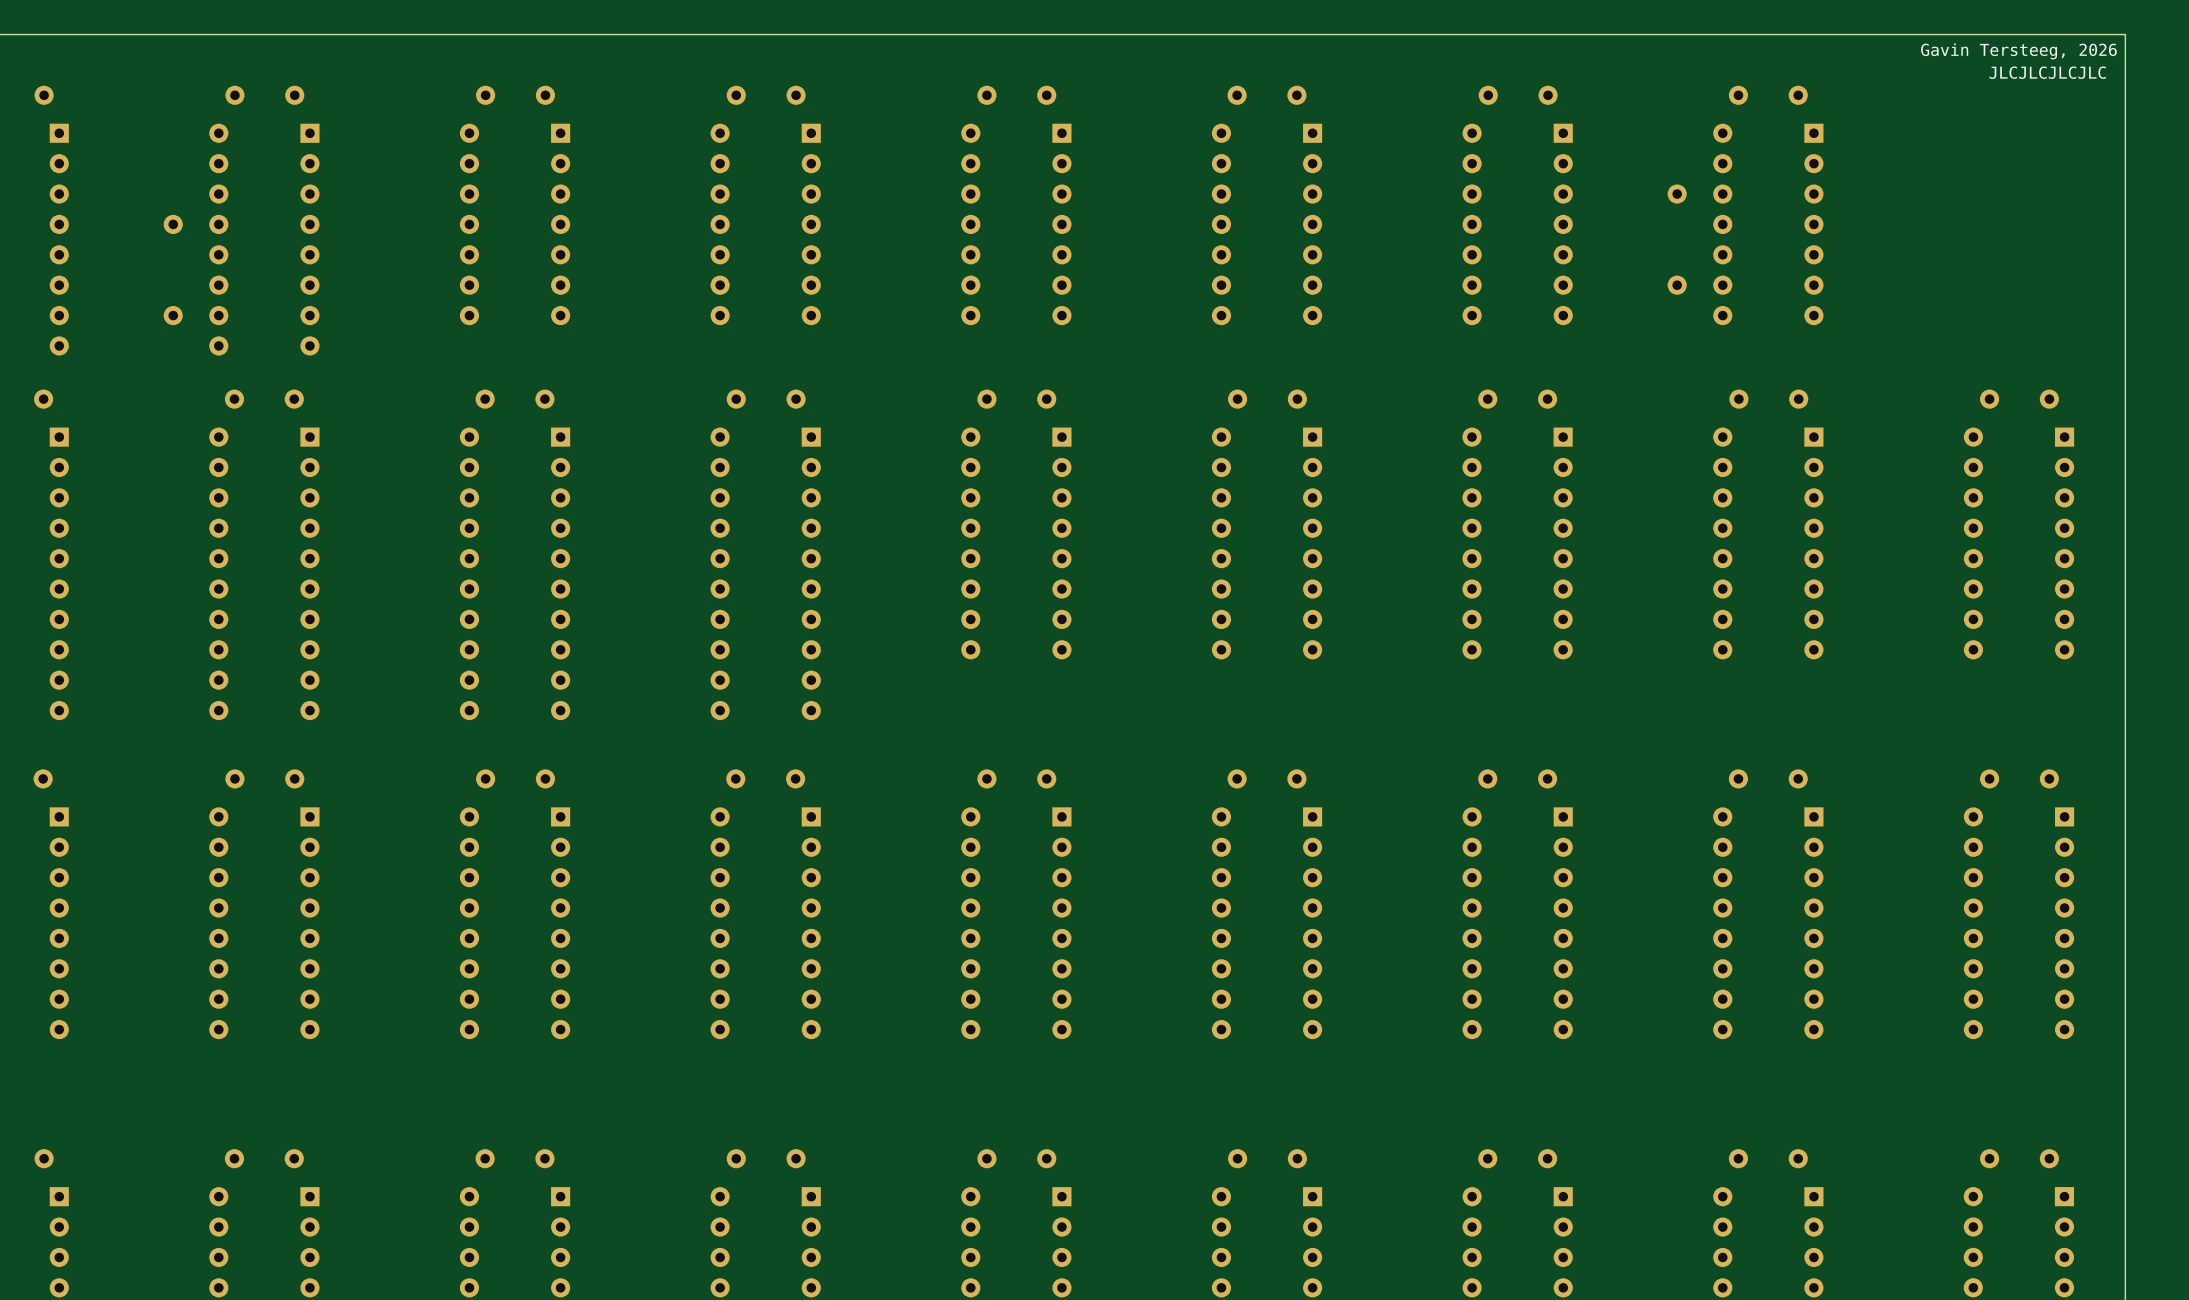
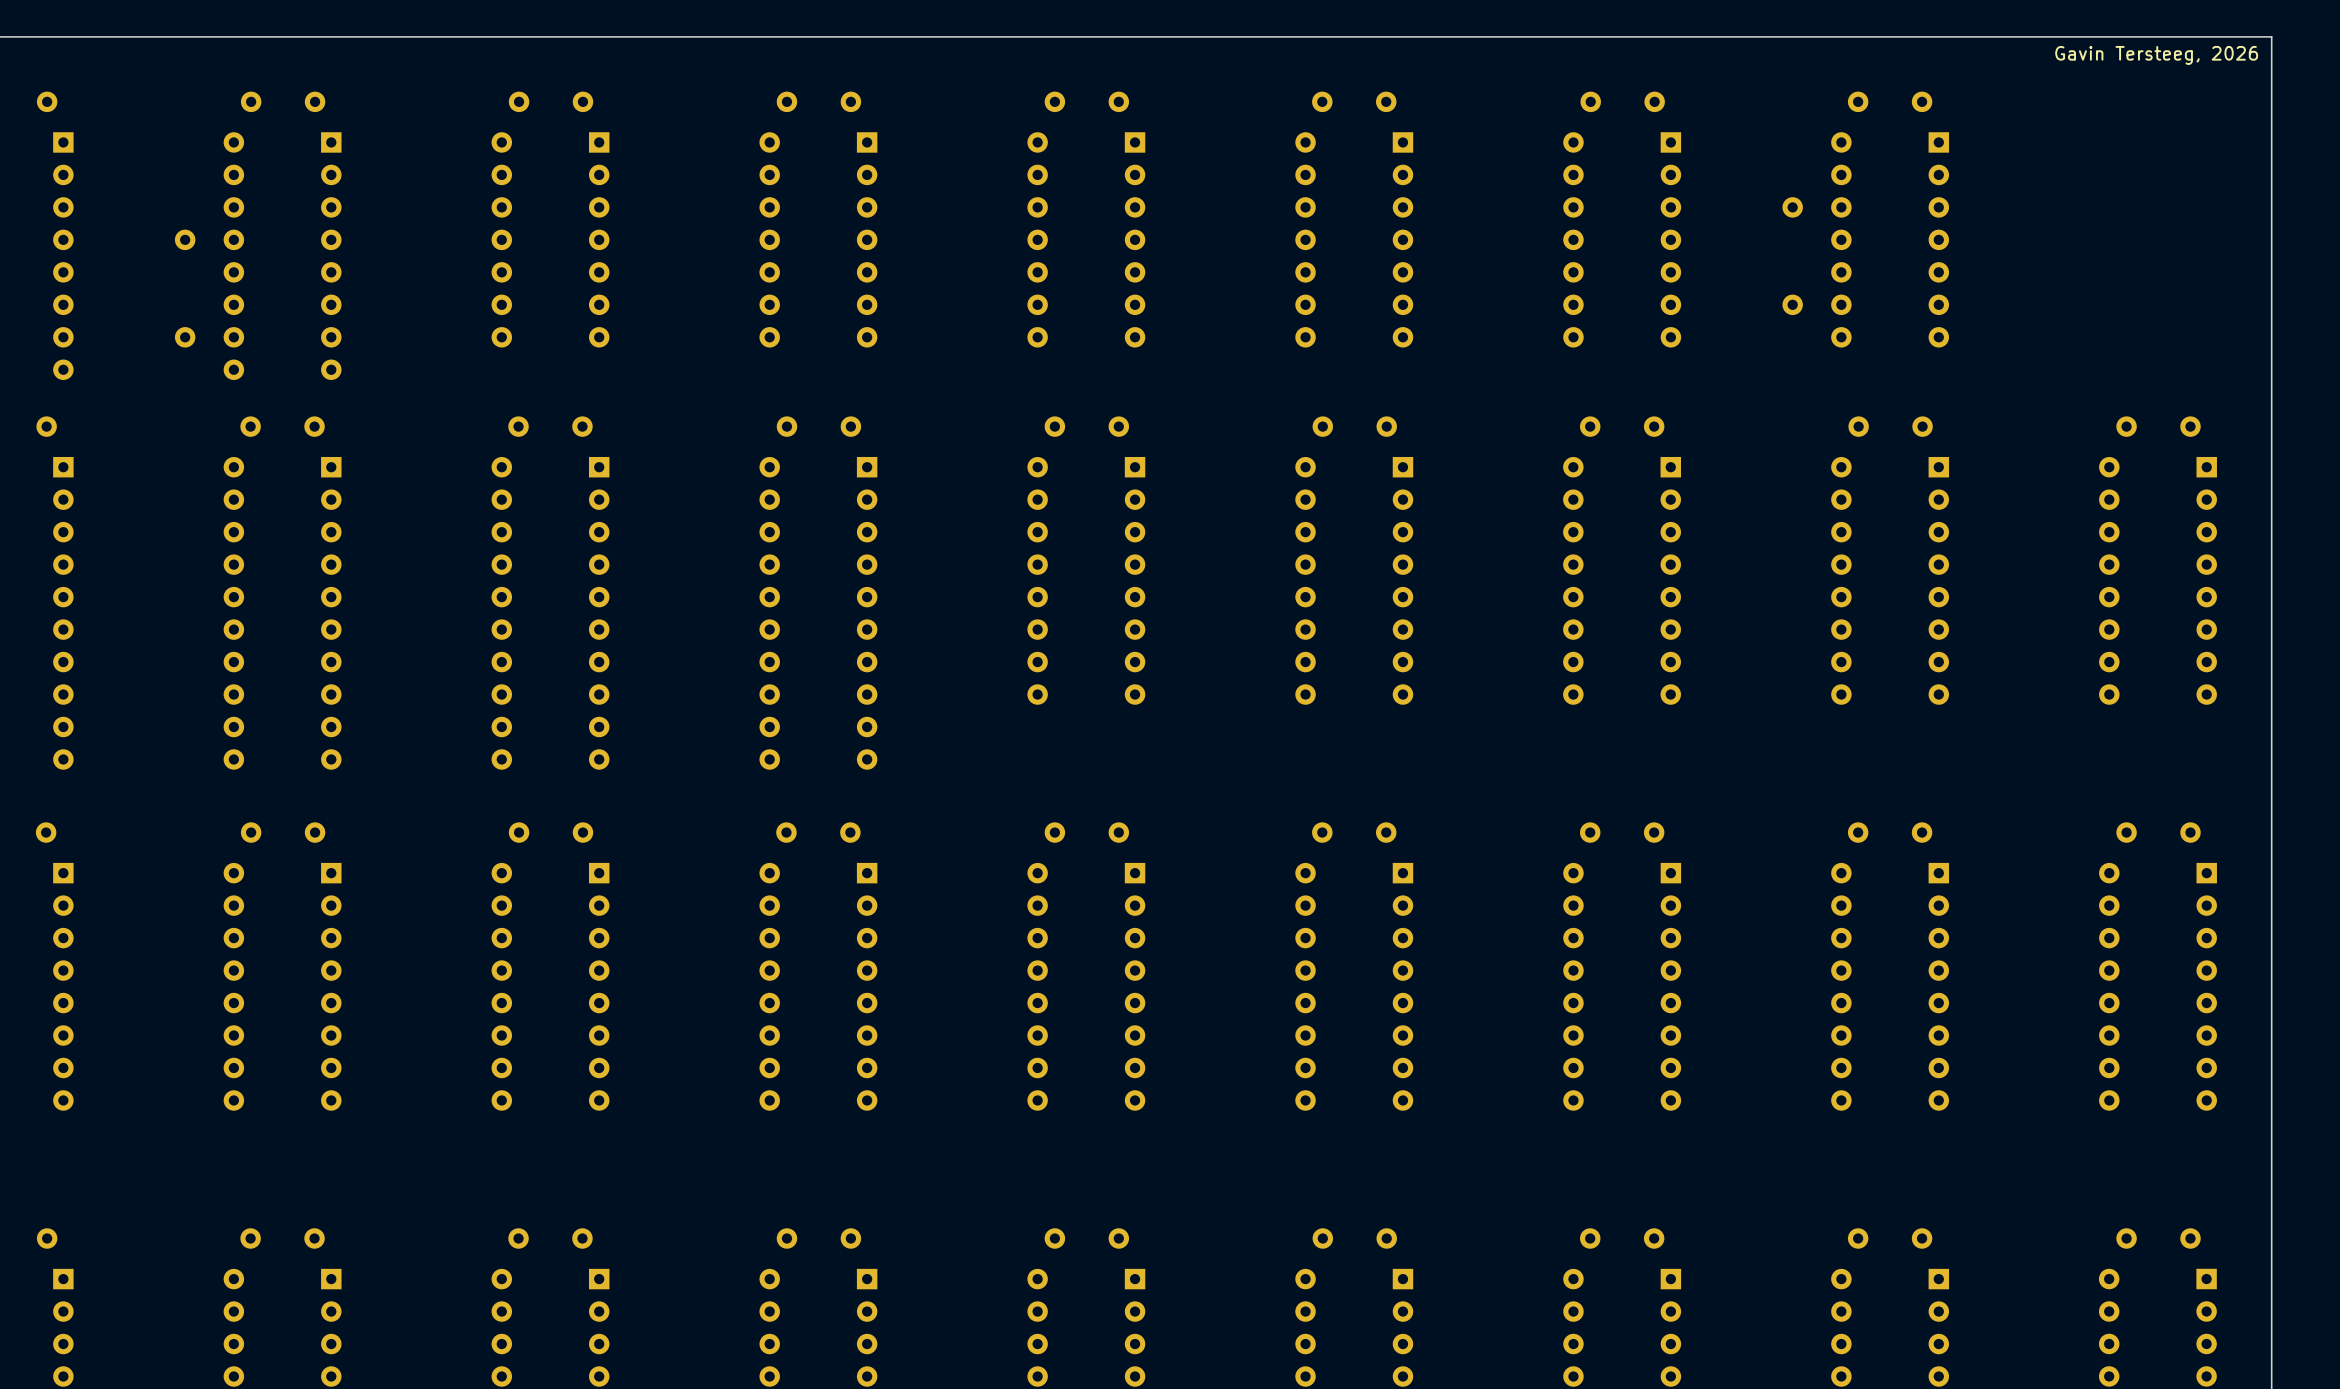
text: JLCJLCJLCJLC (2047, 72) -> none

